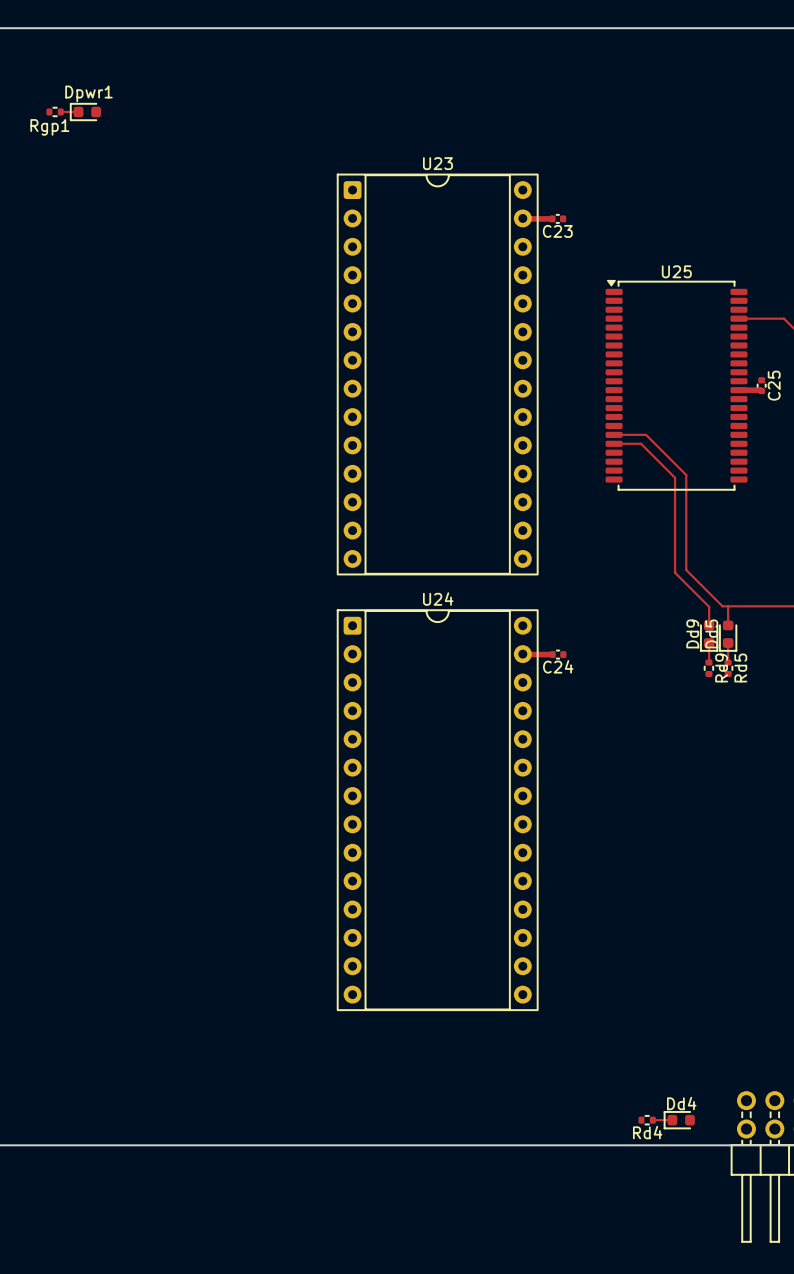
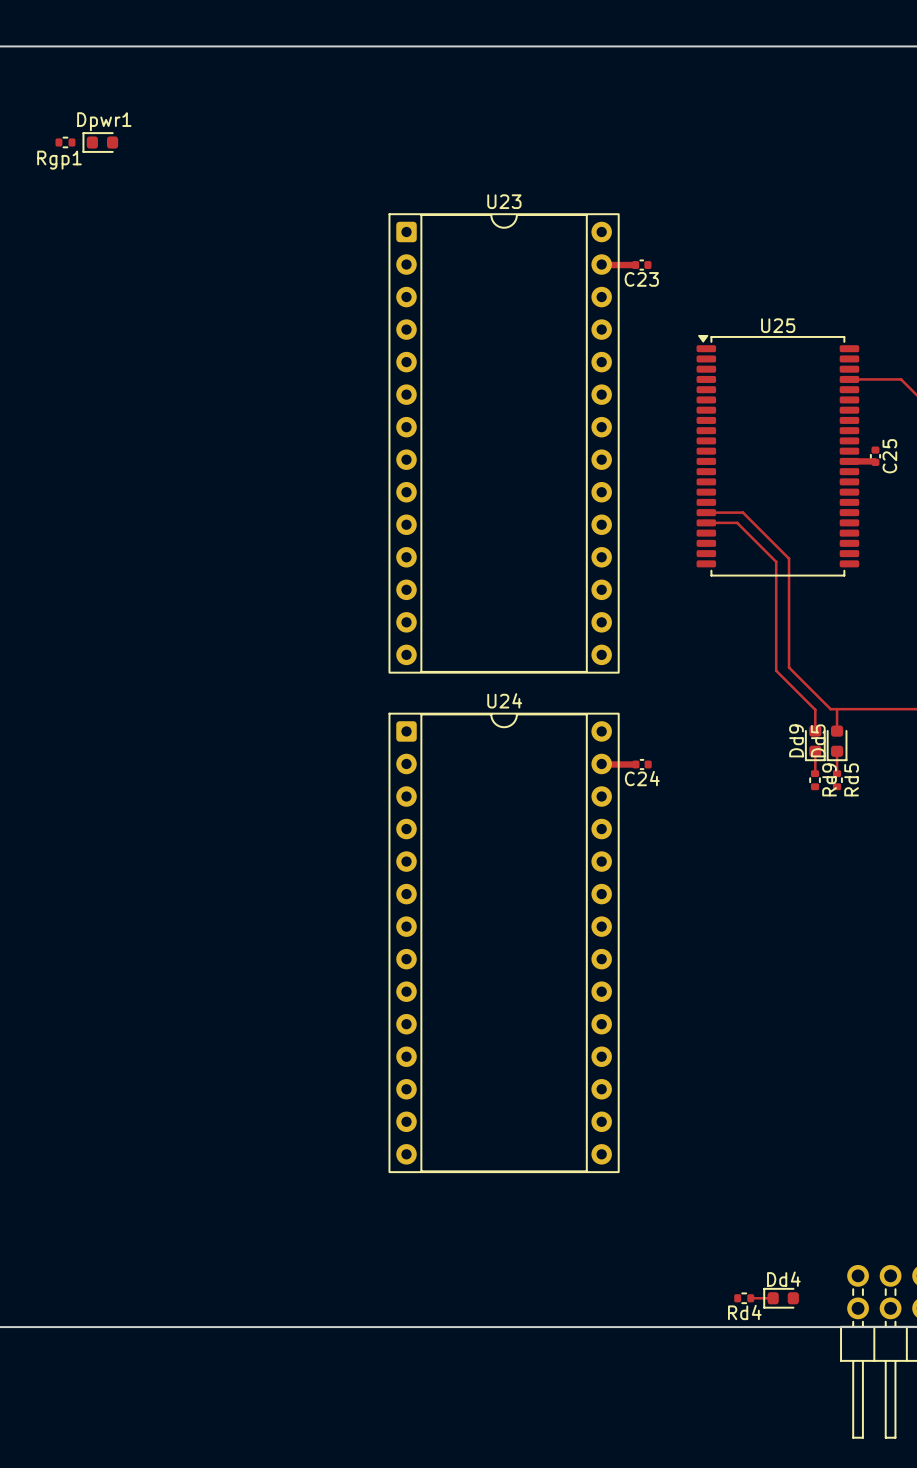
top track: (60, 111) (78, 111) -> none

